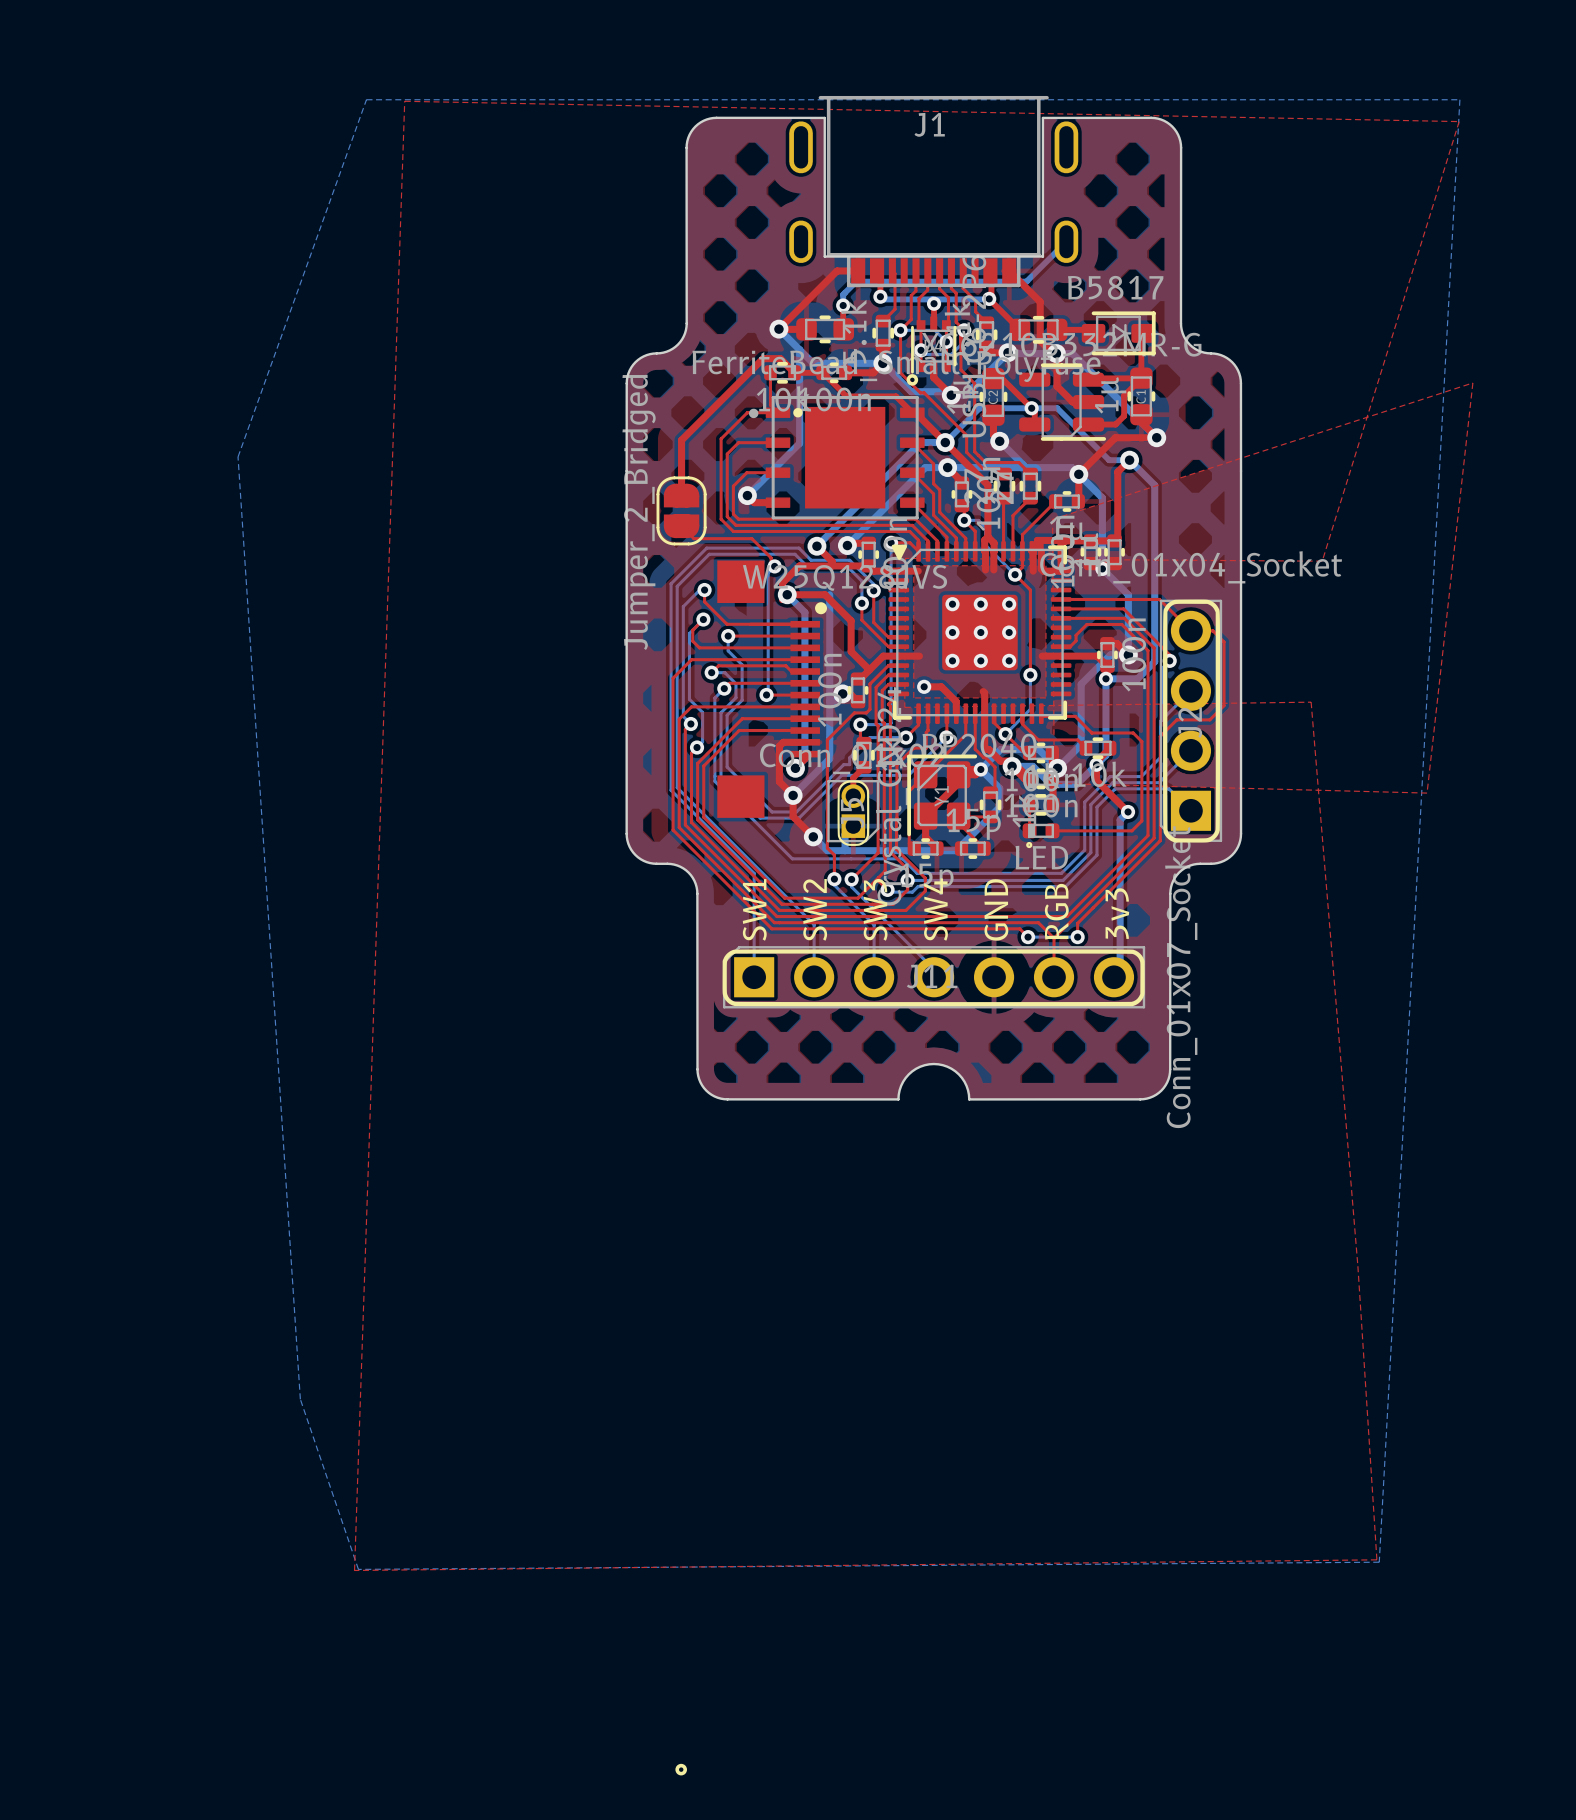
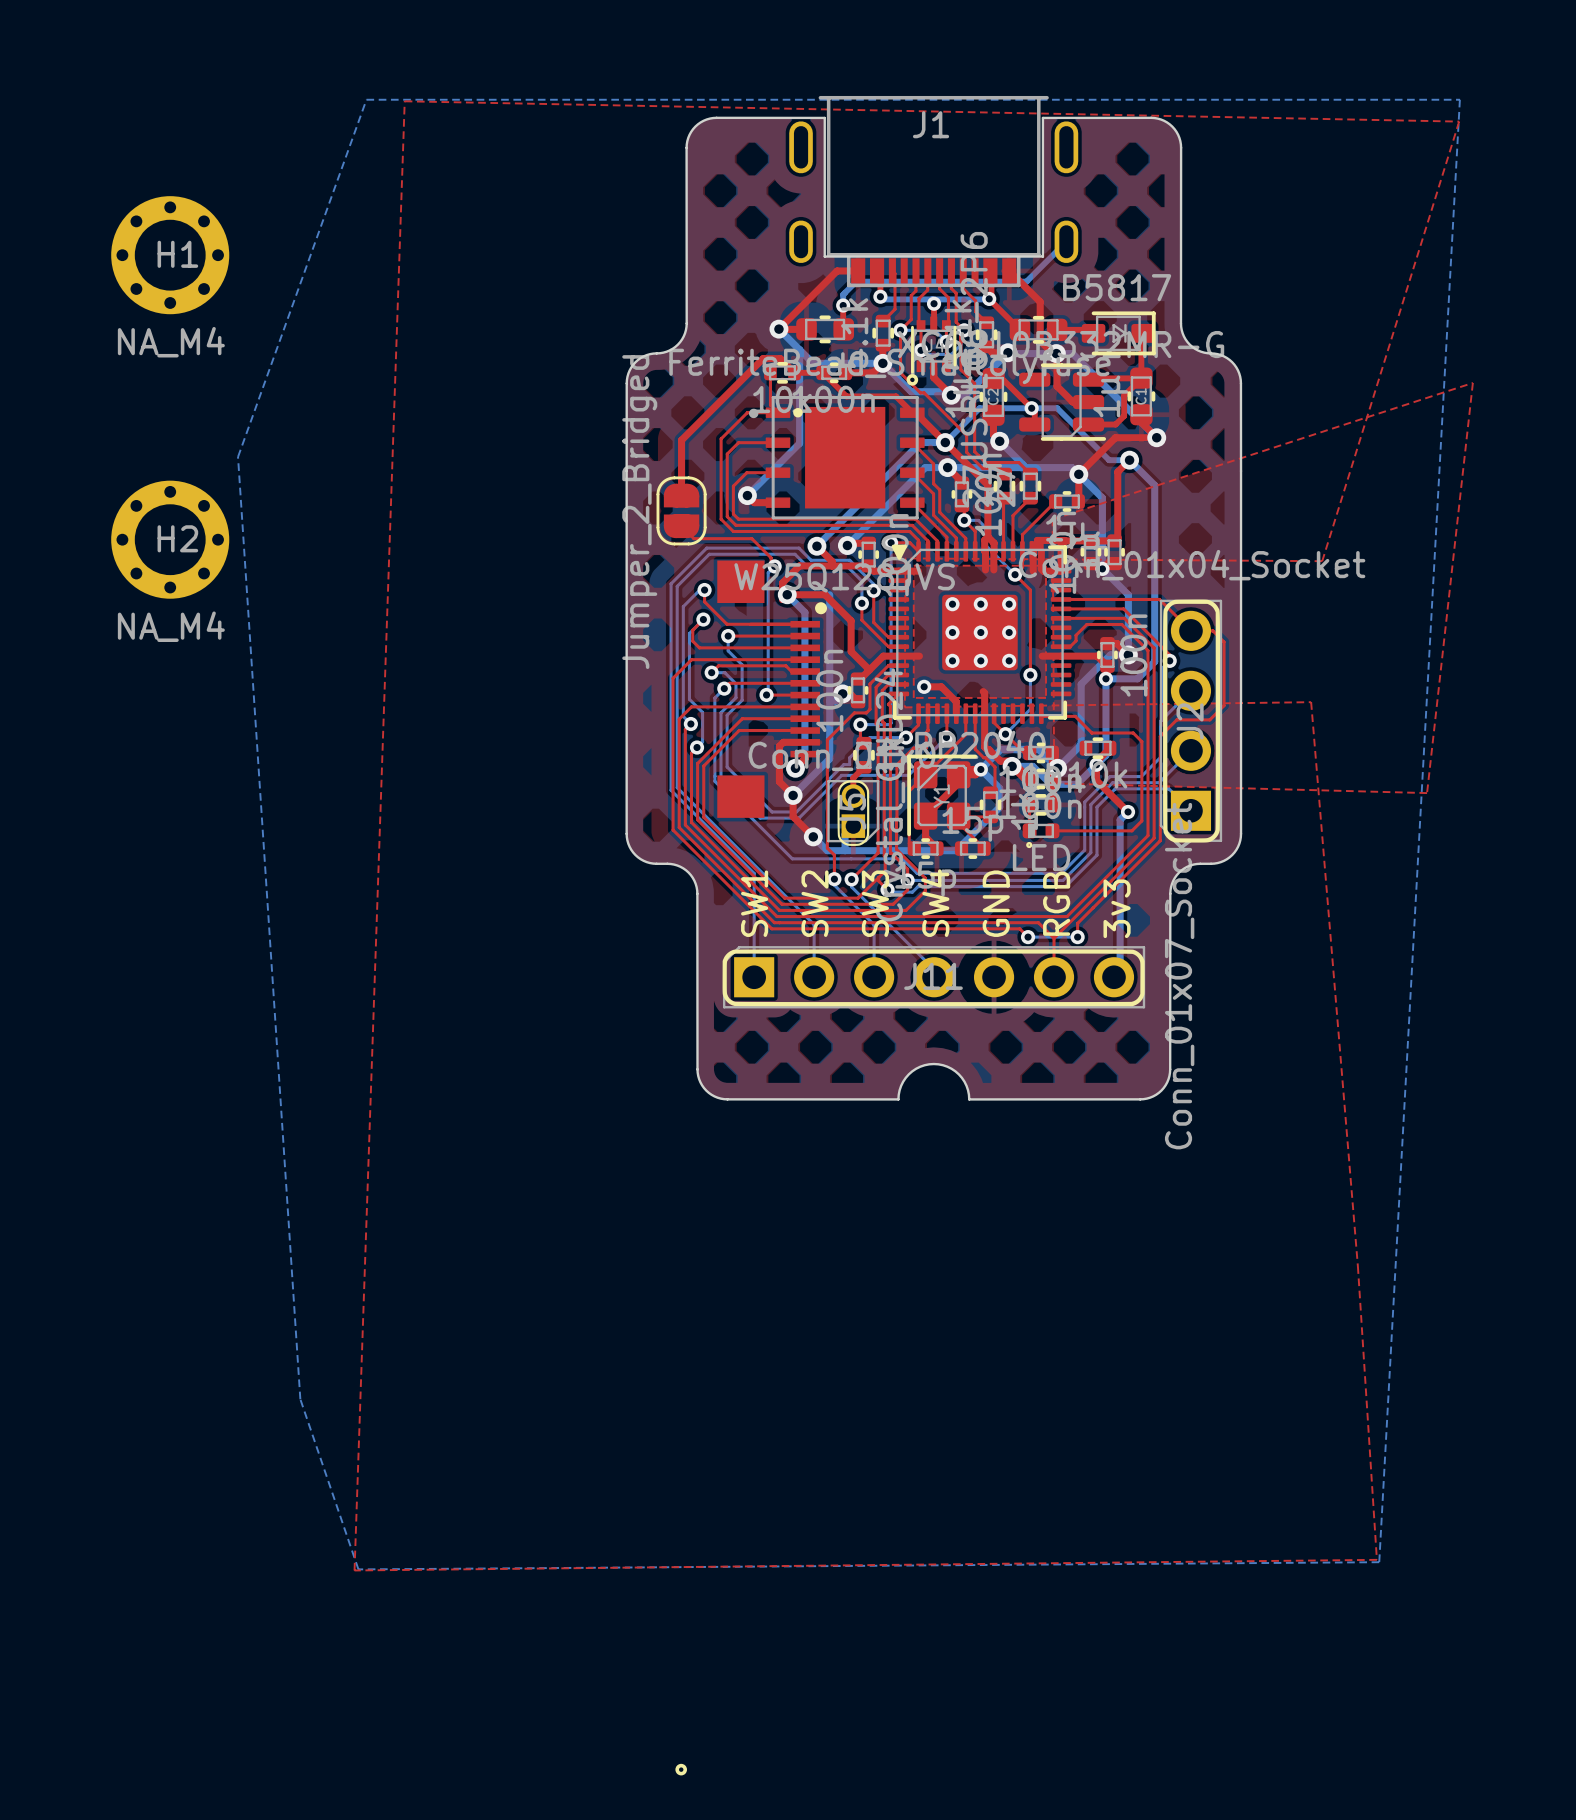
H1: none -> NA_M4 (170, 255)
H2: none -> NA_M4 (170, 539)
top track: (1022, 713) (1022, 724) (1038, 739) (1077, 739) (1085, 748) -> none

